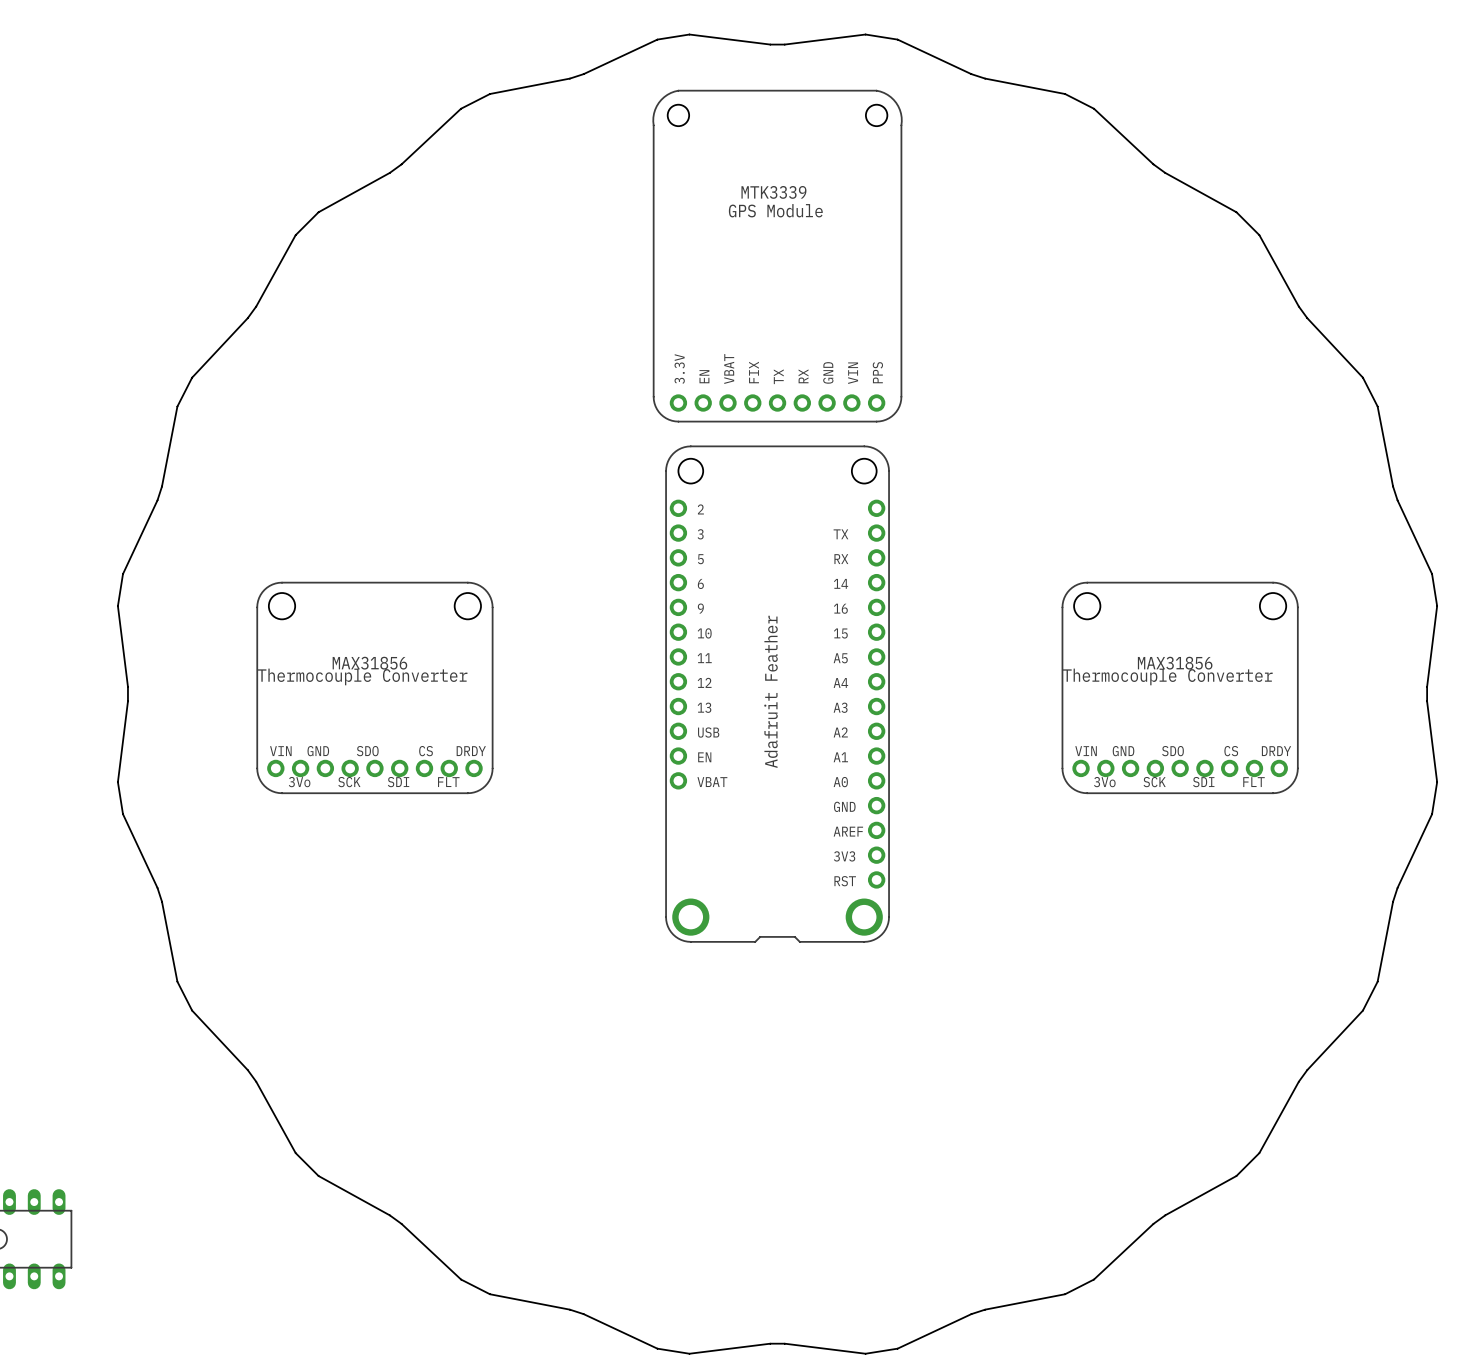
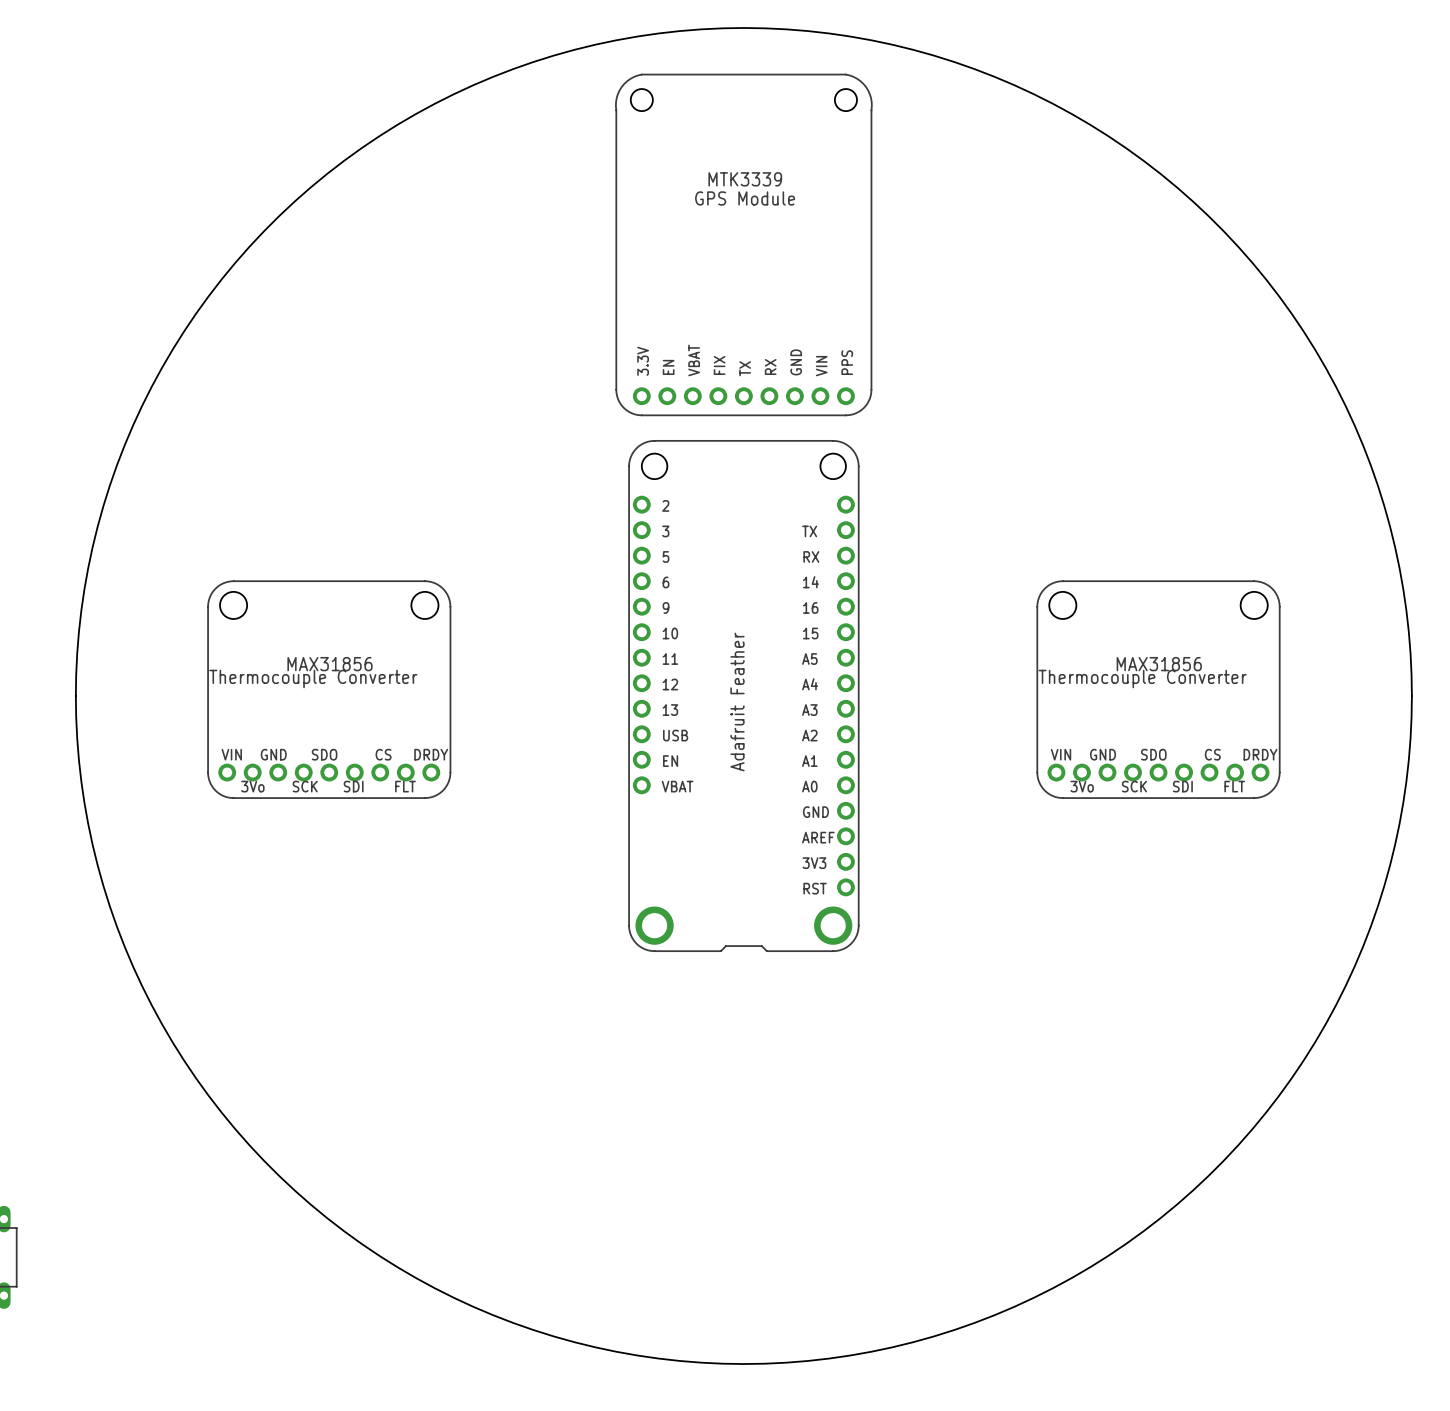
board edge: (689, 34) (770, 44) (784, 44) (865, 34) (897, 39) (971, 74) (985, 78) (1065, 94) (1094, 108) (1153, 164) (1165, 172) (1236, 212) (1259, 235) (1298, 306) (1307, 318) (1362, 377) (1377, 406) (1393, 486) (1397, 500) (1432, 574) (1437, 606) (1427, 686) (1427, 701) (1437, 782) (1432, 814) (1397, 887) (1393, 901) (1377, 981) (1362, 1010) (1307, 1070) (1298, 1081) (1259, 1153) (1236, 1176) (1165, 1215) (1153, 1223) (1094, 1279) (1065, 1294) (985, 1309) (971, 1314) (897, 1348) (865, 1353) (784, 1343) (770, 1343) (689, 1353) (657, 1348) (583, 1314) (569, 1309) (489, 1294) (461, 1279) (401, 1223) (389, 1215) (318, 1176) (295, 1153) (256, 1081) (247, 1070) (192, 1010) (177, 981) (162, 901) (157, 887) (123, 814) (117, 782) (127, 701) (127, 686) (117, 606) (123, 574) (157, 500) (162, 486) (177, 406) (192, 377) (247, 318) (256, 306) (295, 235) (318, 212) (389, 172) (401, 164) (461, 108) (489, 94) (569, 78) (583, 74) (657, 39) (689, 34) -> (75, 696) (78, 631) (88, 568) (103, 505) (124, 445) (151, 387) (184, 331) (221, 279) (264, 231) (310, 187) (361, 148) (434, 103) (493, 76) (553, 55) (616, 40) (679, 31) (743, 27) (808, 31) (871, 40) (933, 55) (994, 76) (1052, 103) (1108, 136) (1160, 173) (1208, 216) (1252, 262) (1291, 313) (1336, 387) (1363, 445) (1384, 505) (1399, 568) (1408, 631) (1411, 696) (1408, 760) (1399, 823) (1384, 886) (1363, 946) (1336, 1005) (1303, 1060) (1266, 1112) (1223, 1160) (1176, 1204) (1126, 1243) (1052, 1288) (994, 1315) (933, 1336) (871, 1351) (808, 1360) (743, 1364) (679, 1360) (616, 1351) (553, 1336) (493, 1315) (434, 1288) (379, 1255) (327, 1218) (279, 1175) (235, 1129) (195, 1078) (151, 1005) (124, 946) (103, 886) (88, 823) (78, 760) (75, 696)

